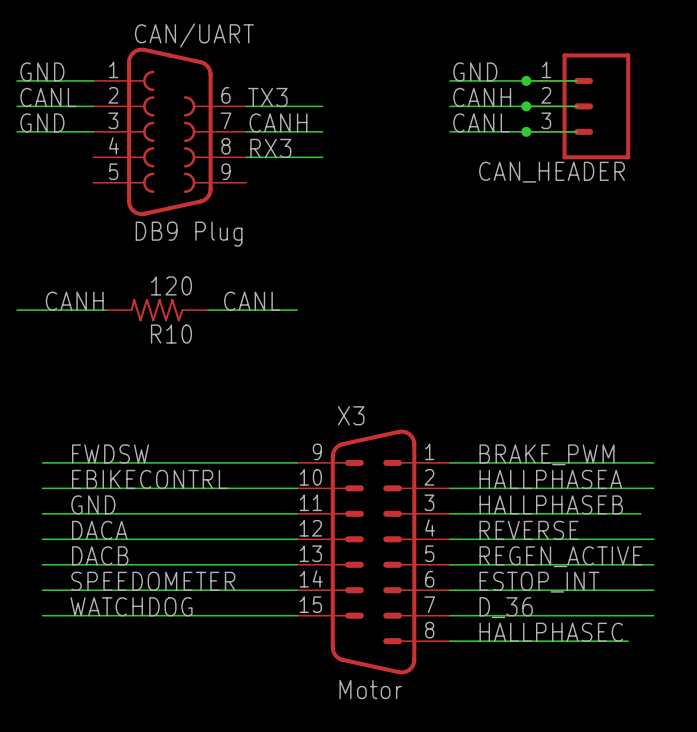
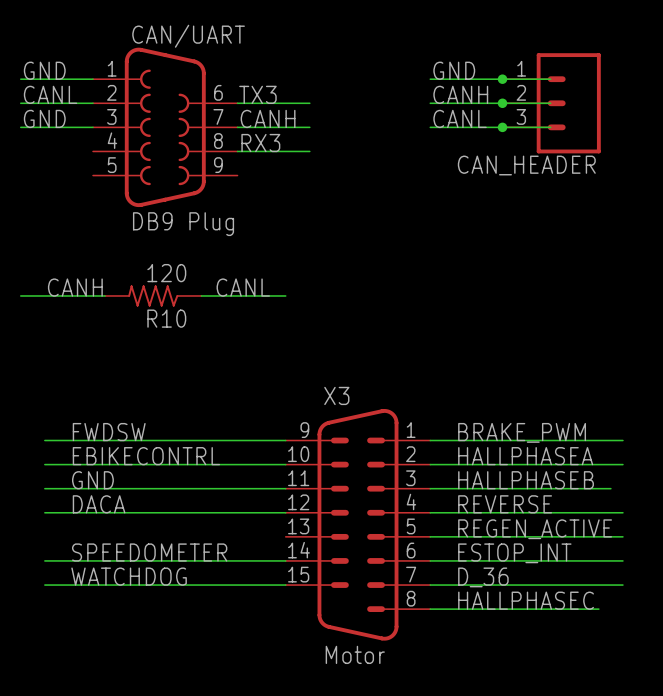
label: DACB (100, 555) -> none
wire: (42, 564) (297, 564) -> none

